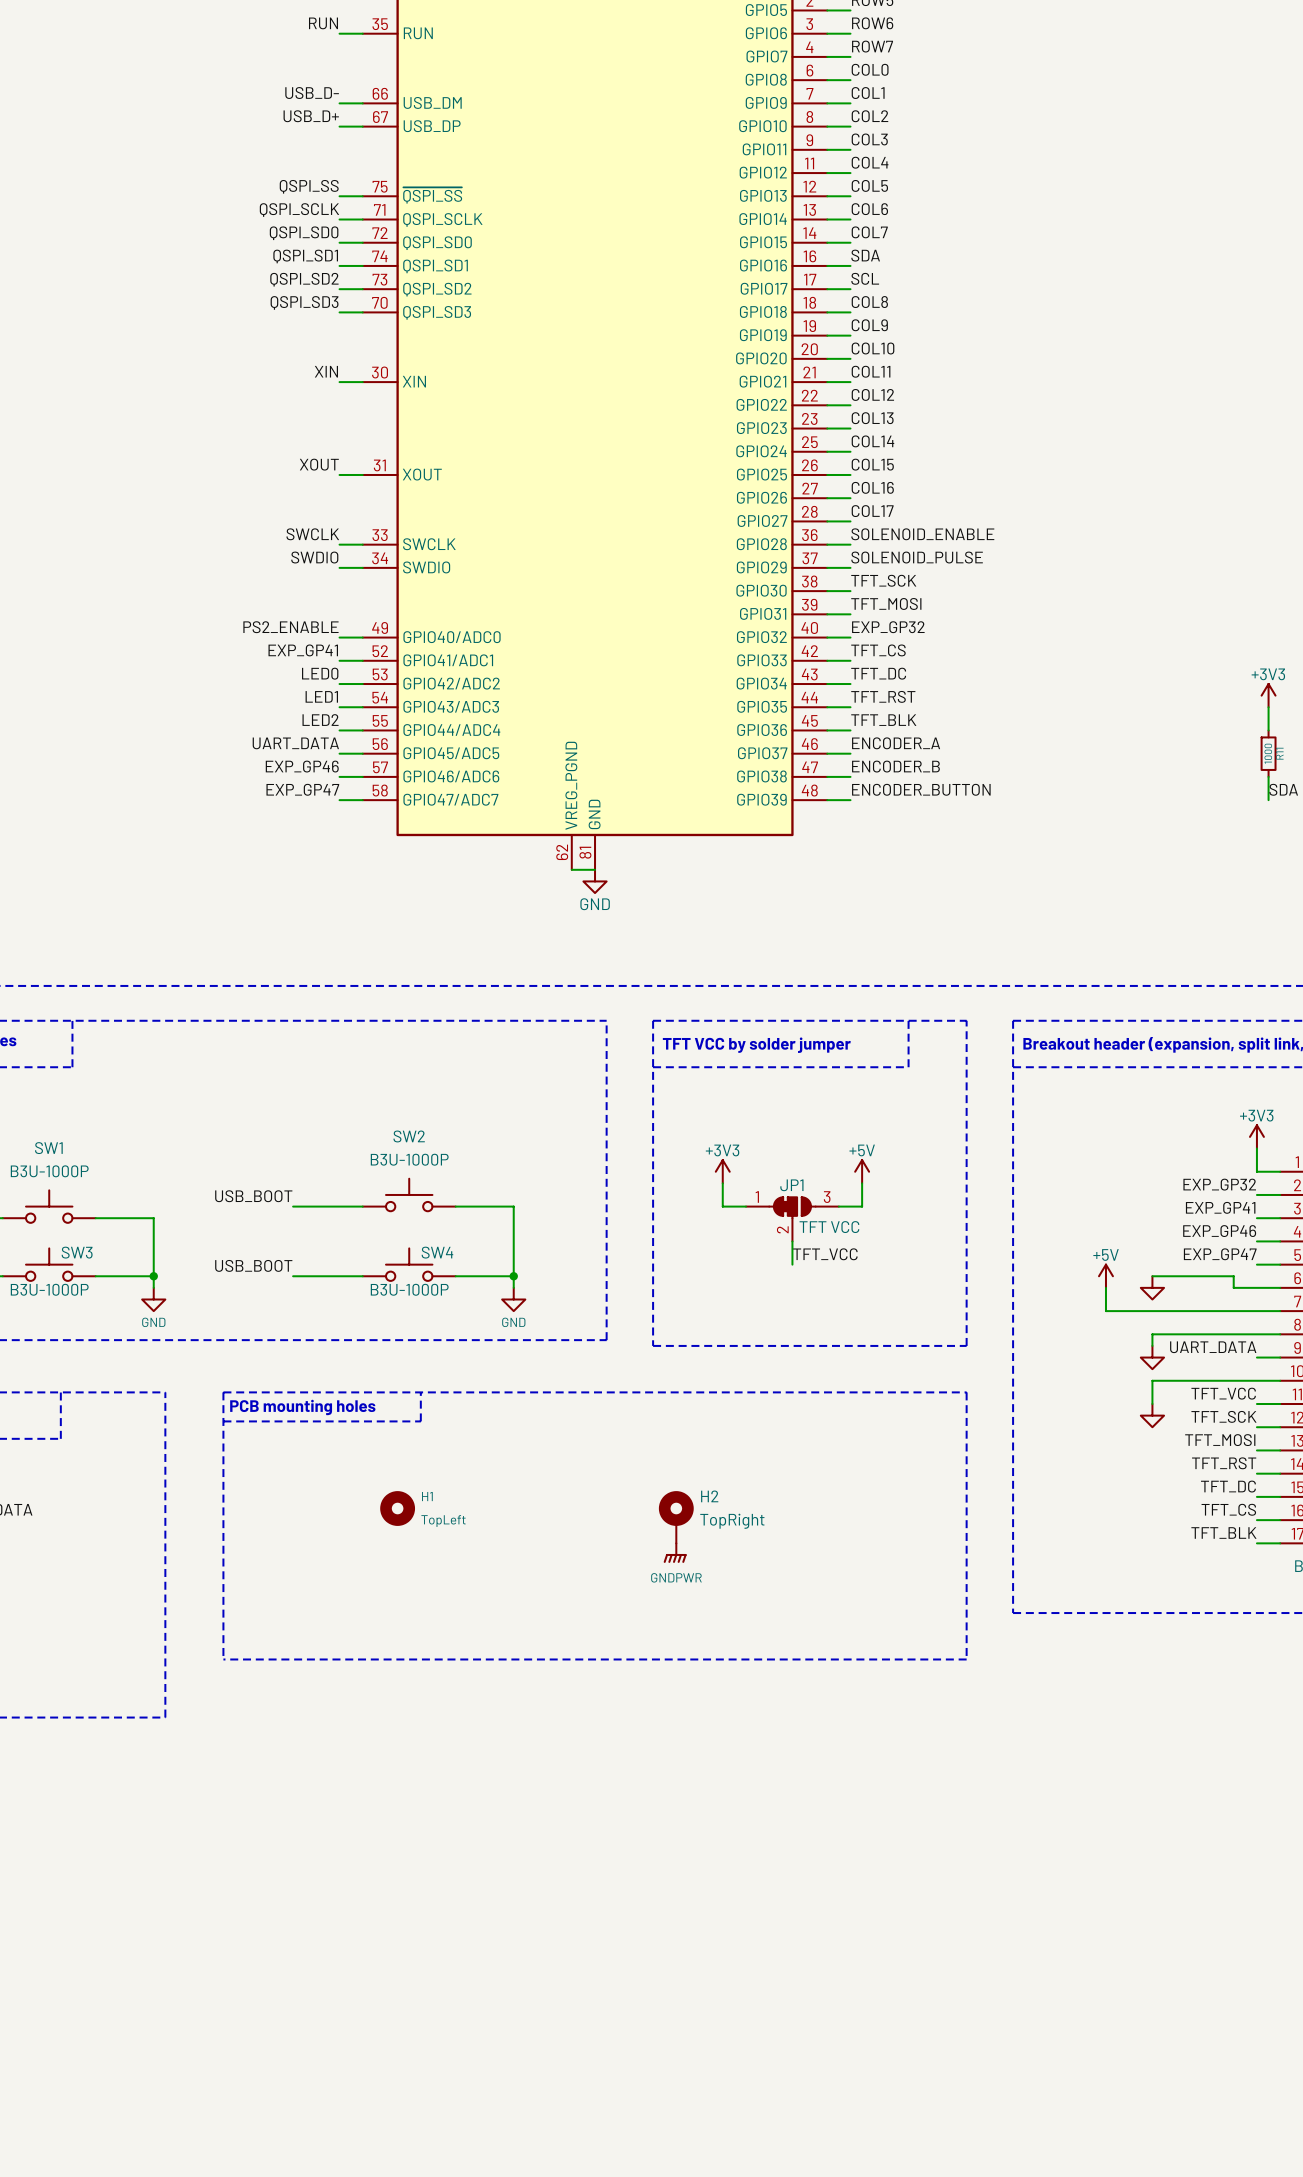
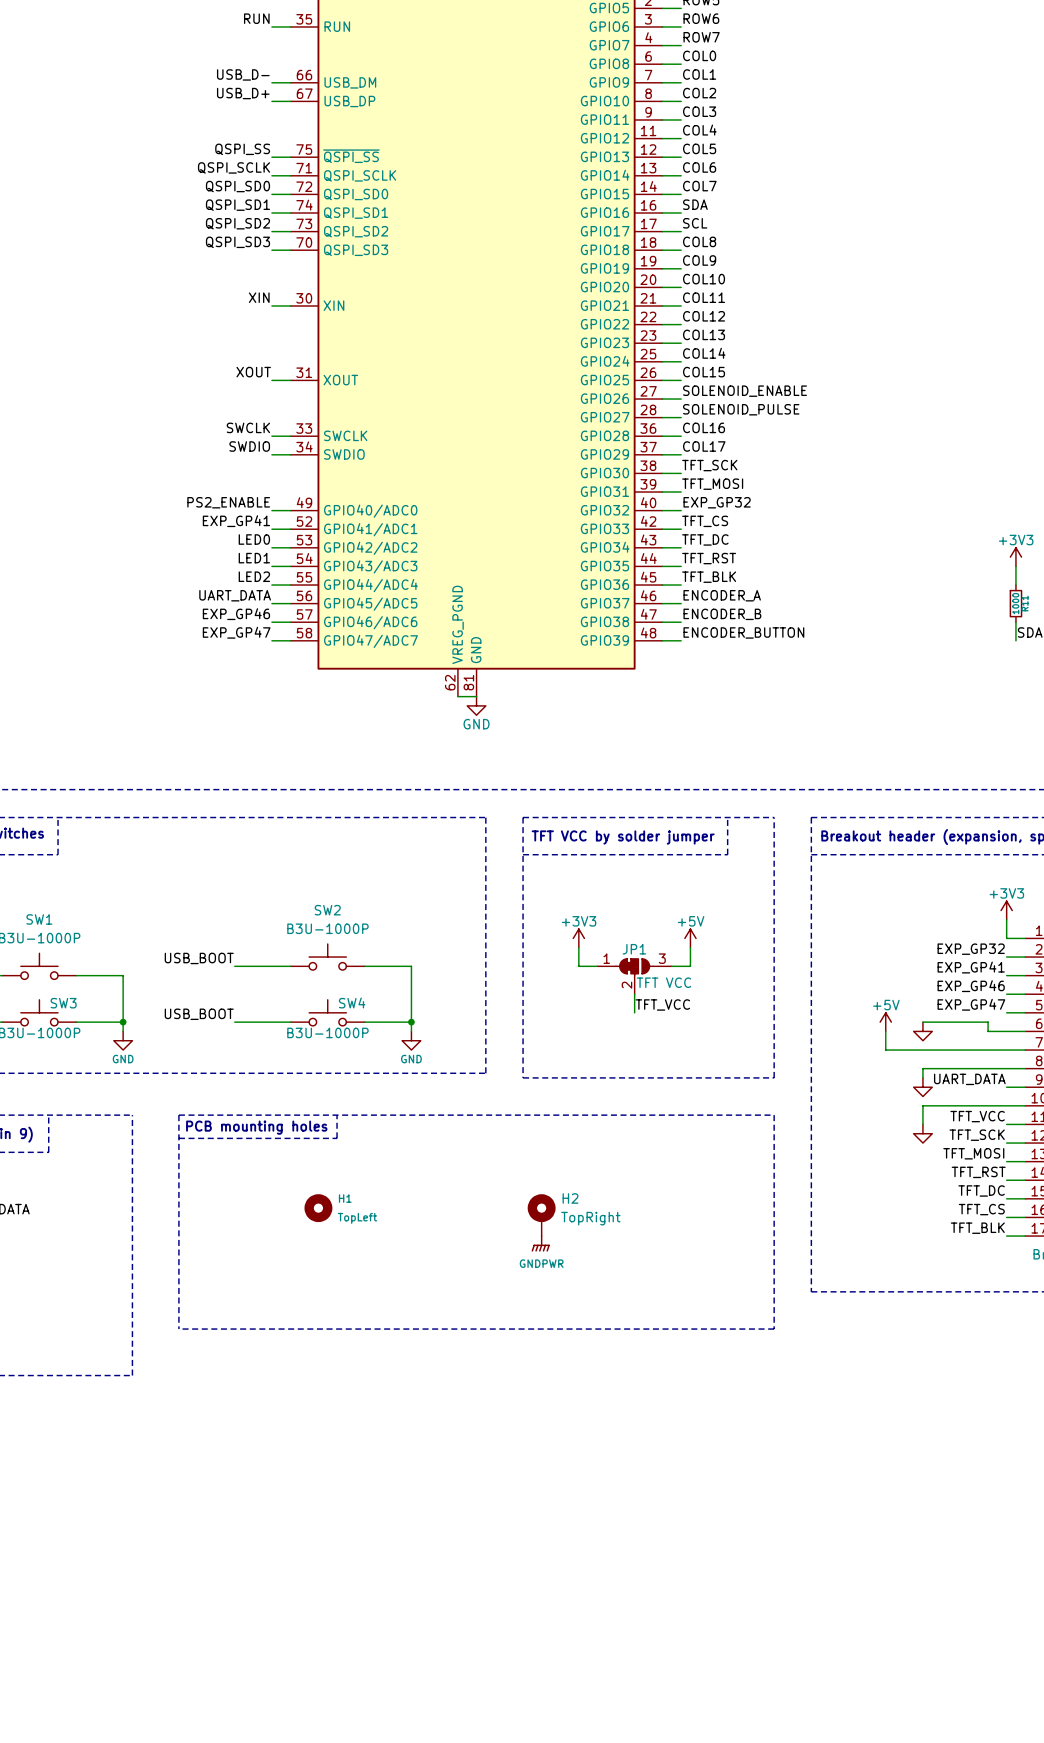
label: COL16 (872, 487) -> SOLENOID_ENABLE (744, 391)
label: COL17 (872, 511) -> SOLENOID_PULSE (741, 409)
label: SOLENOID_ENABLE (922, 534) -> COL16 (704, 427)
label: SOLENOID_PULSE (917, 557) -> COL17 (704, 446)

